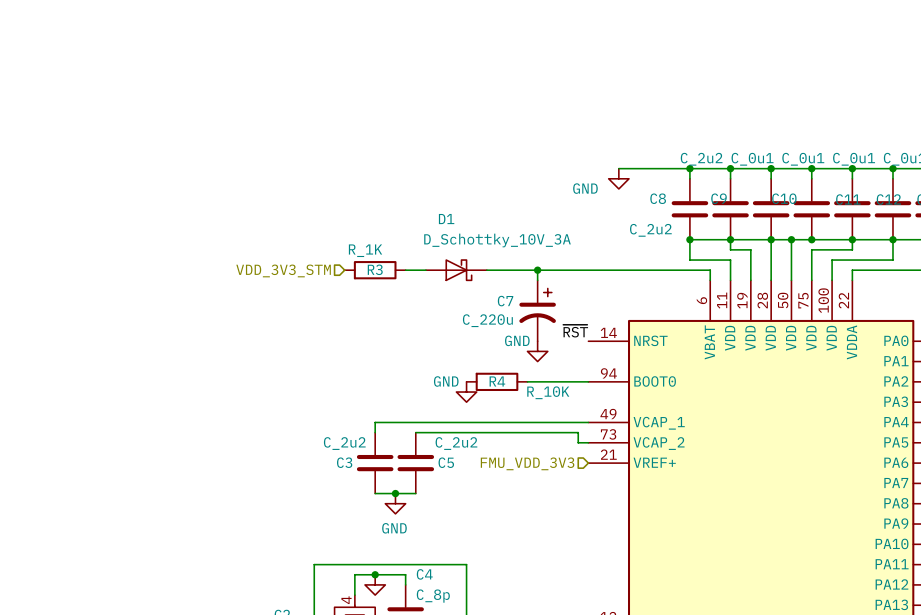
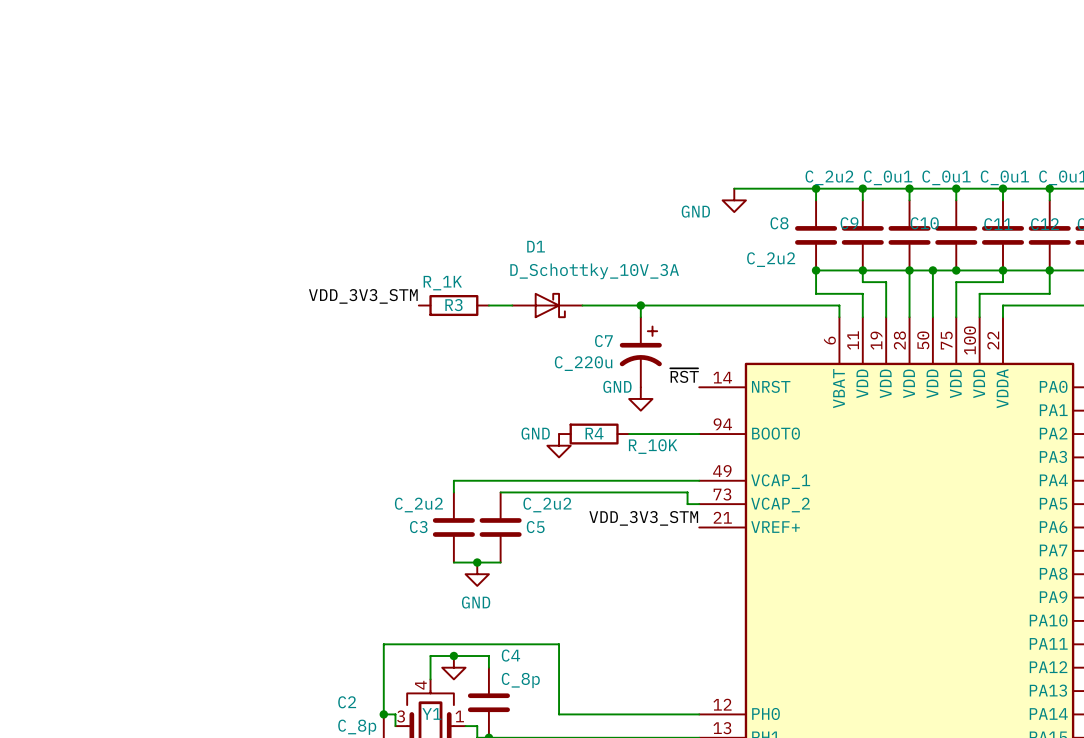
label: none -> VDD_3V3_STM (363, 296)
hierarchical label: VDD_3V3_STM (283, 270) -> none
label: none -> VDD_3V3_STM (643, 518)
hierarchical label: FMU_VDD_3V3 (527, 463) -> none

